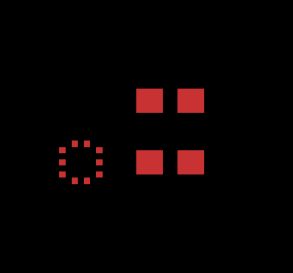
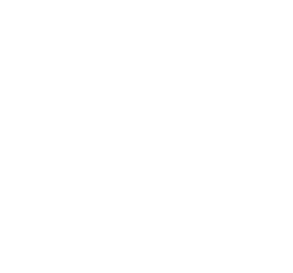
part: (170, 100) -> none
part: (80, 162) -> none
part: (170, 162) -> none

